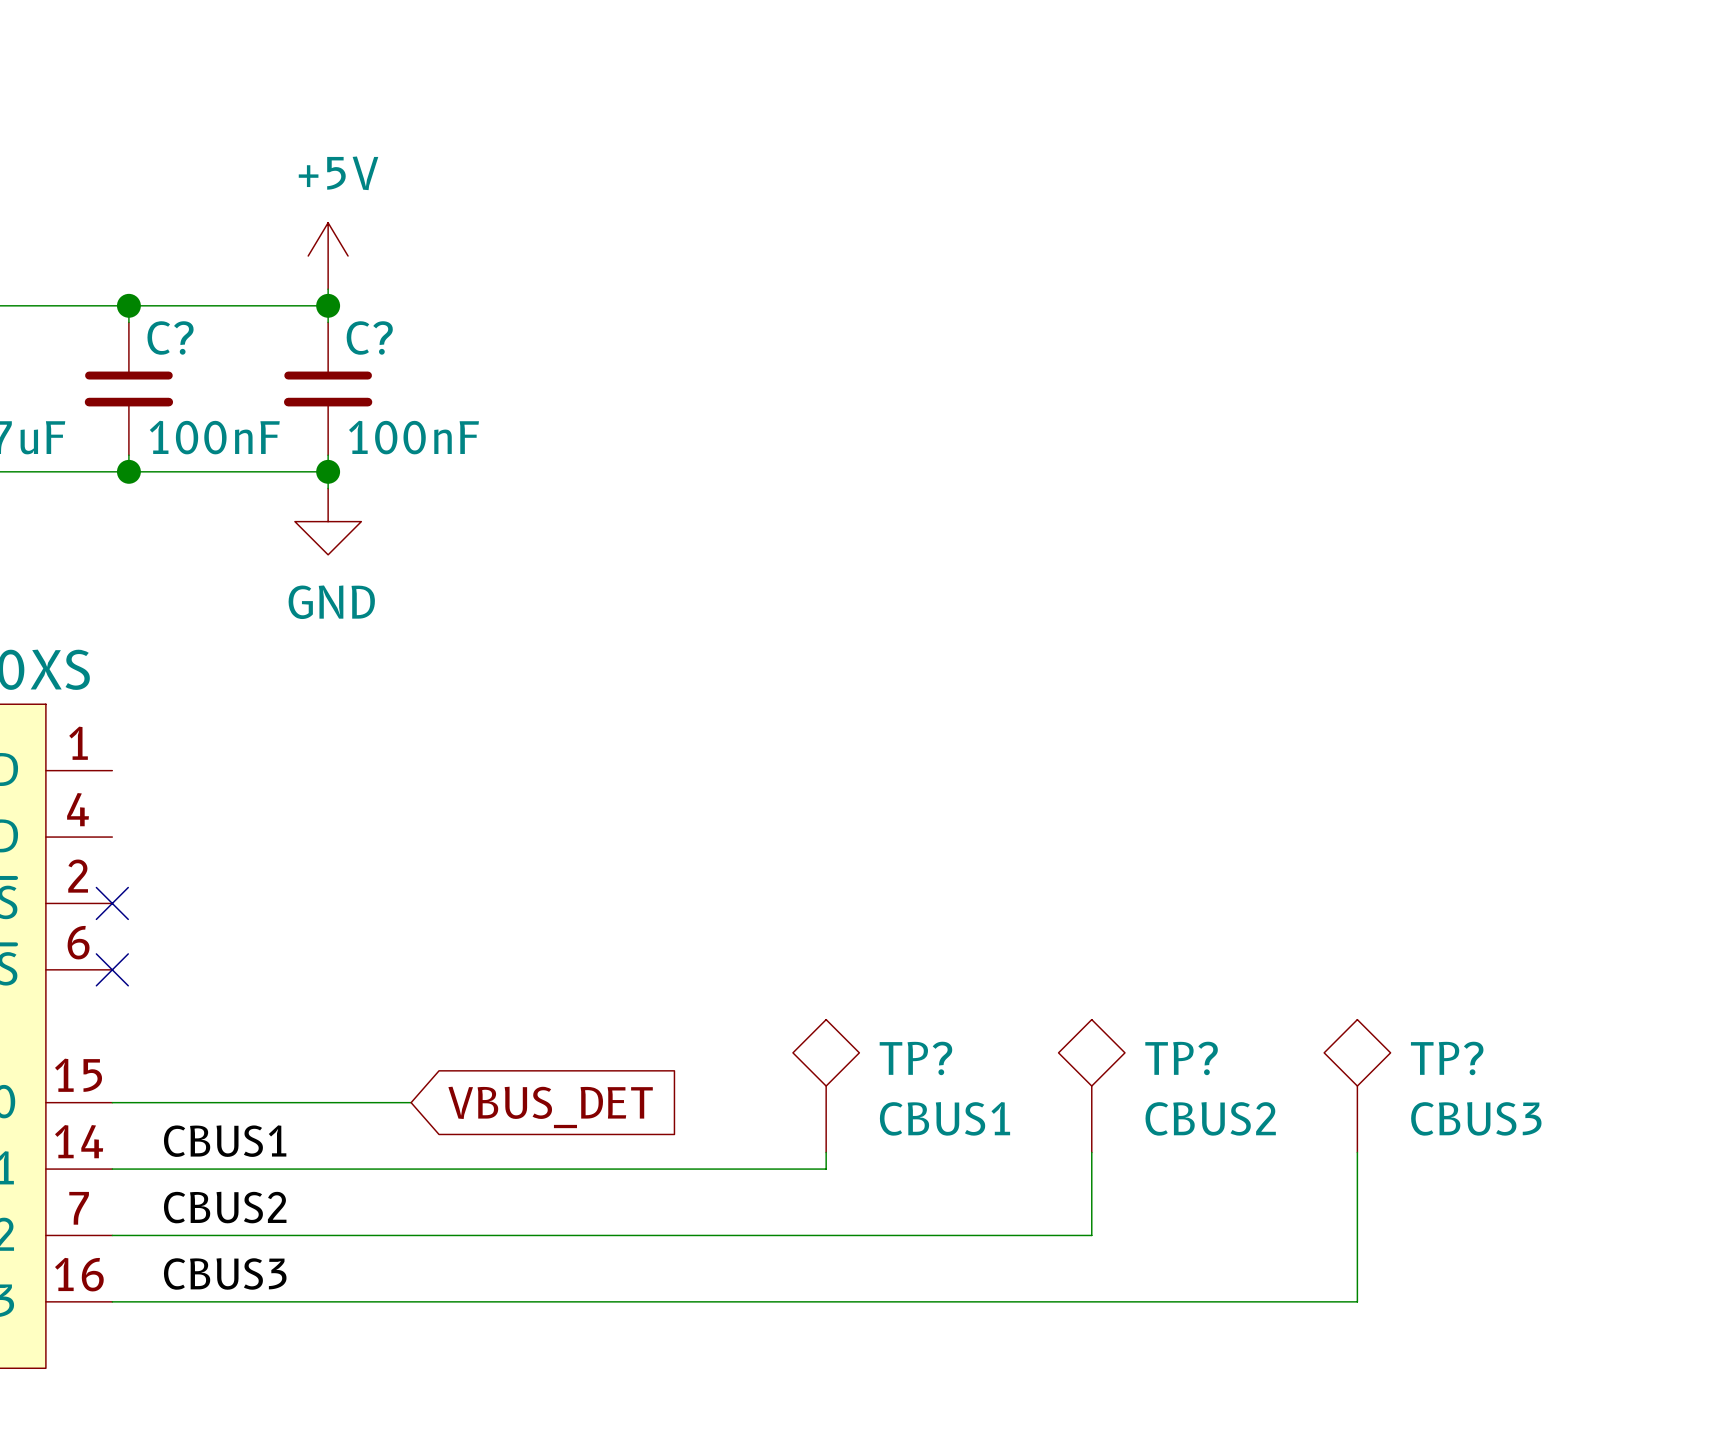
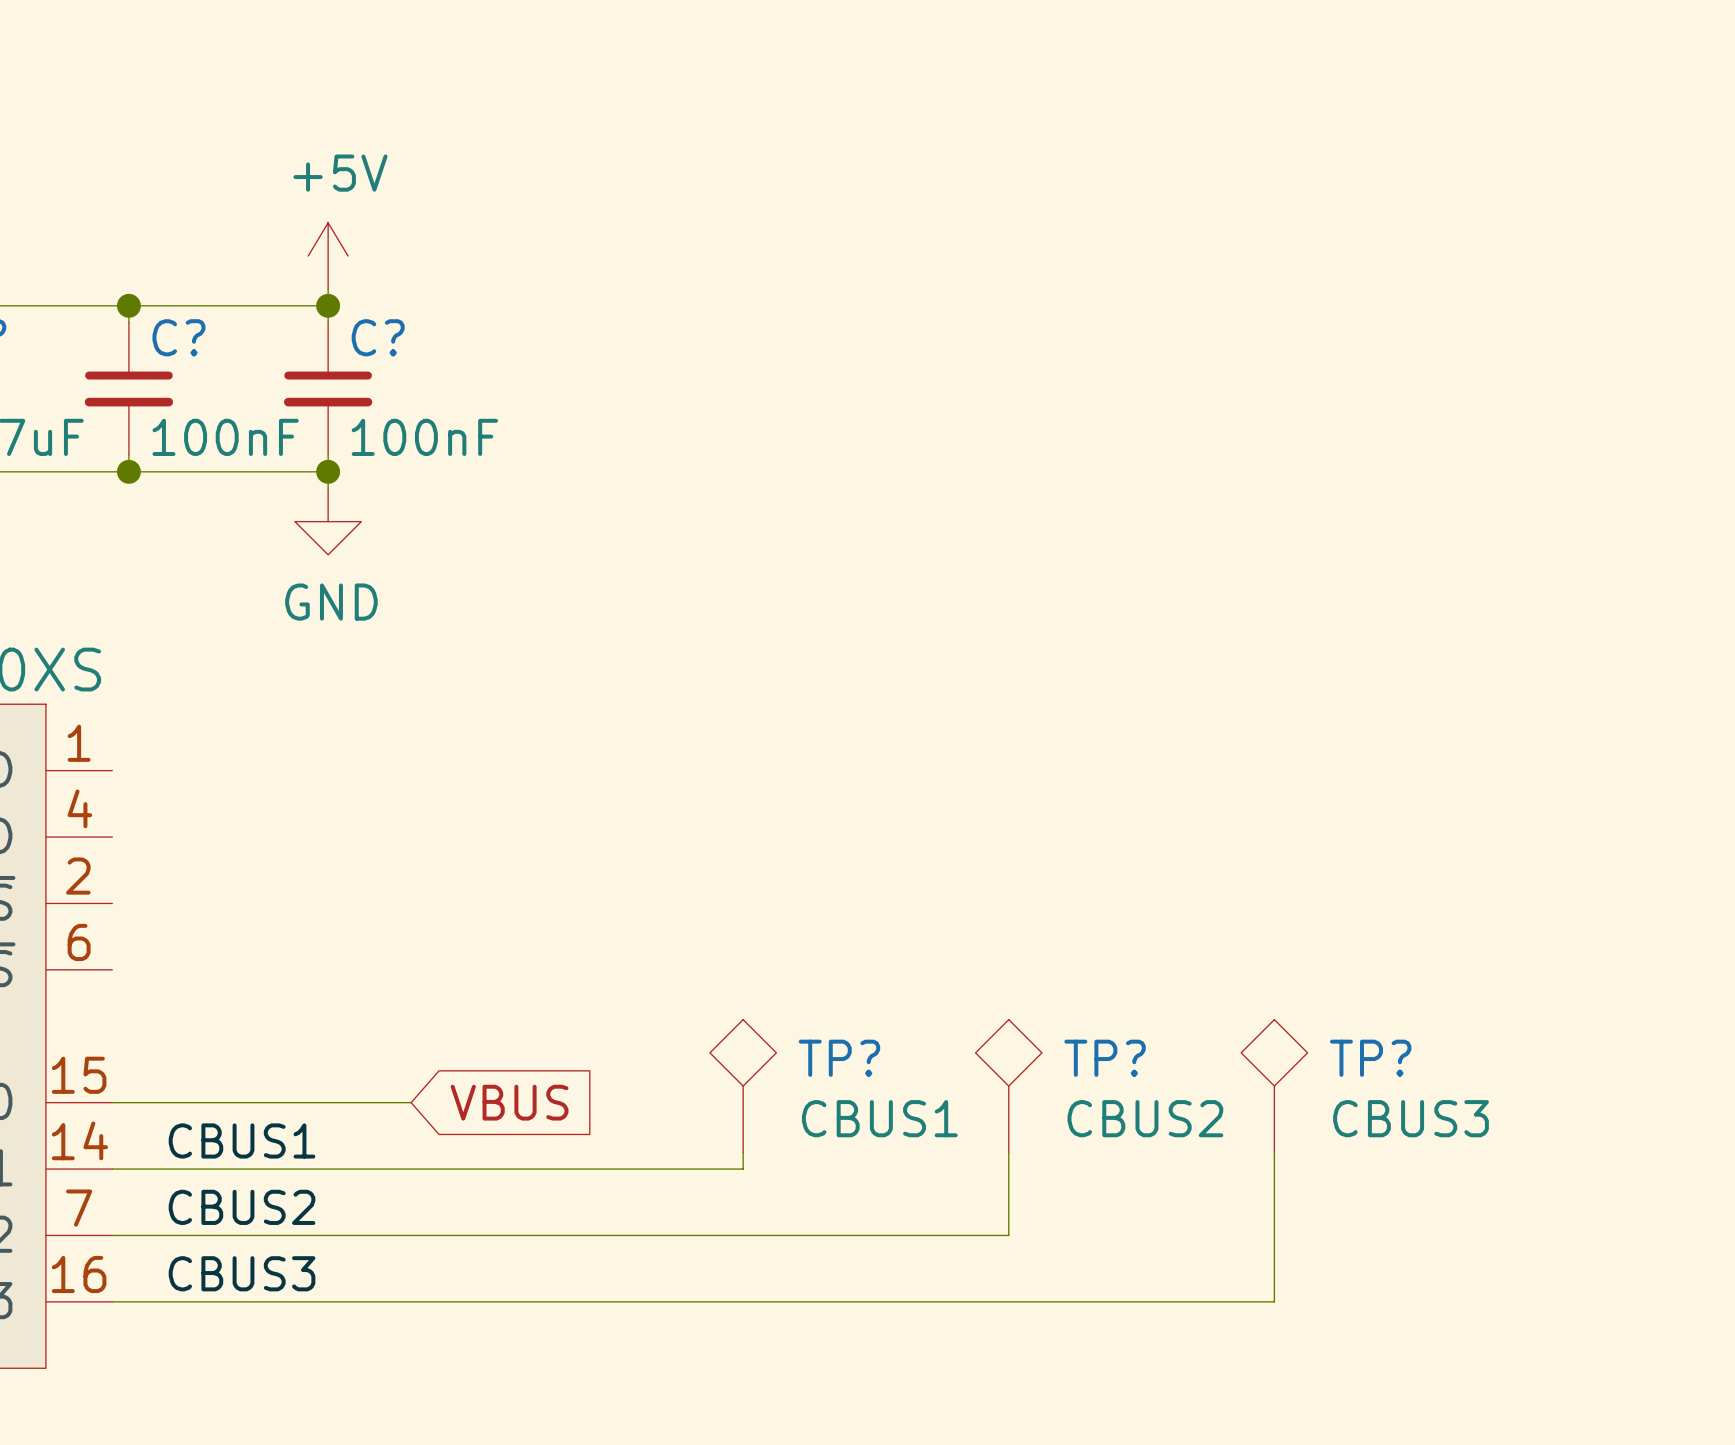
no-connect mark: (112, 903) -> none
no-connect mark: (112, 969) -> none
TP? position: (826, 1086) -> (743, 1086)
TP? position: (1091, 1086) -> (1008, 1086)
TP? position: (1357, 1086) -> (1274, 1086)
global label: VBUS_DET (550, 1107) -> VBUS (509, 1102)
wire: (826, 1152) (826, 1169) (743, 1169) -> (743, 1152) (743, 1169)
wire: (1091, 1152) (1091, 1235) (1008, 1235) -> (1008, 1152) (1008, 1235)
wire: (1357, 1152) (1357, 1301) (1274, 1301) -> (1274, 1152) (1274, 1301)

